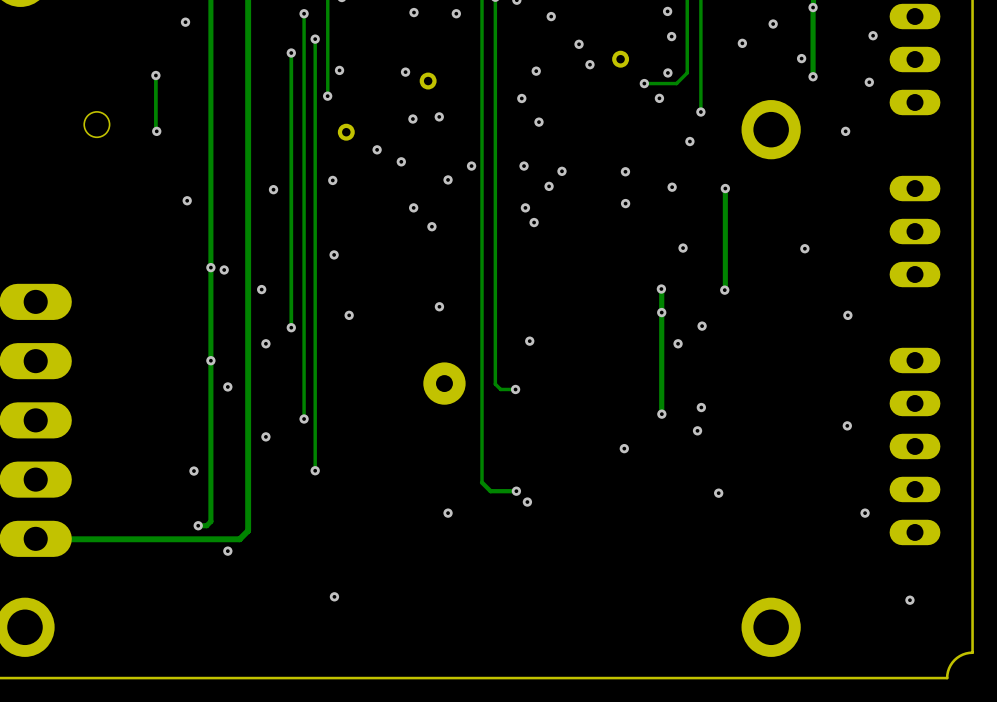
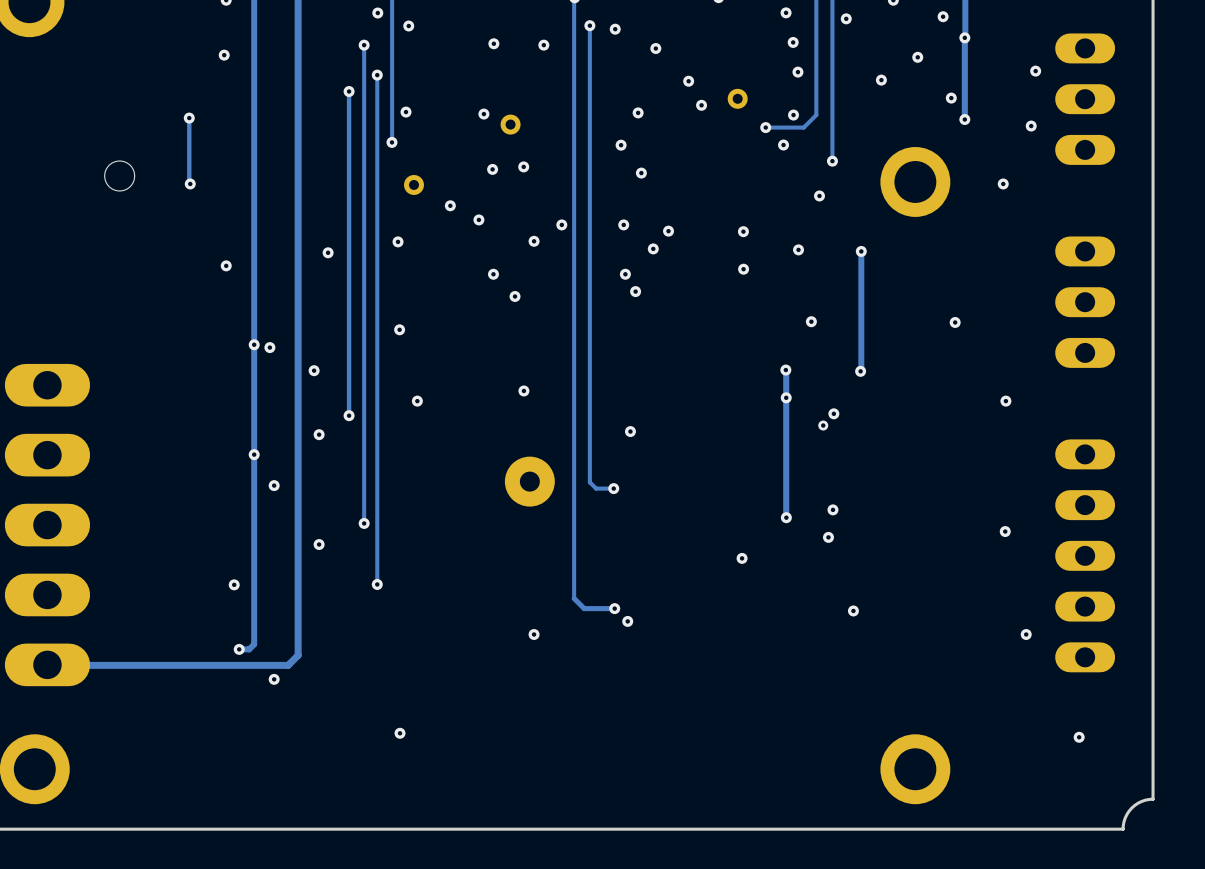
via: none -> (823, 425)
via: (678, 343) -> none

